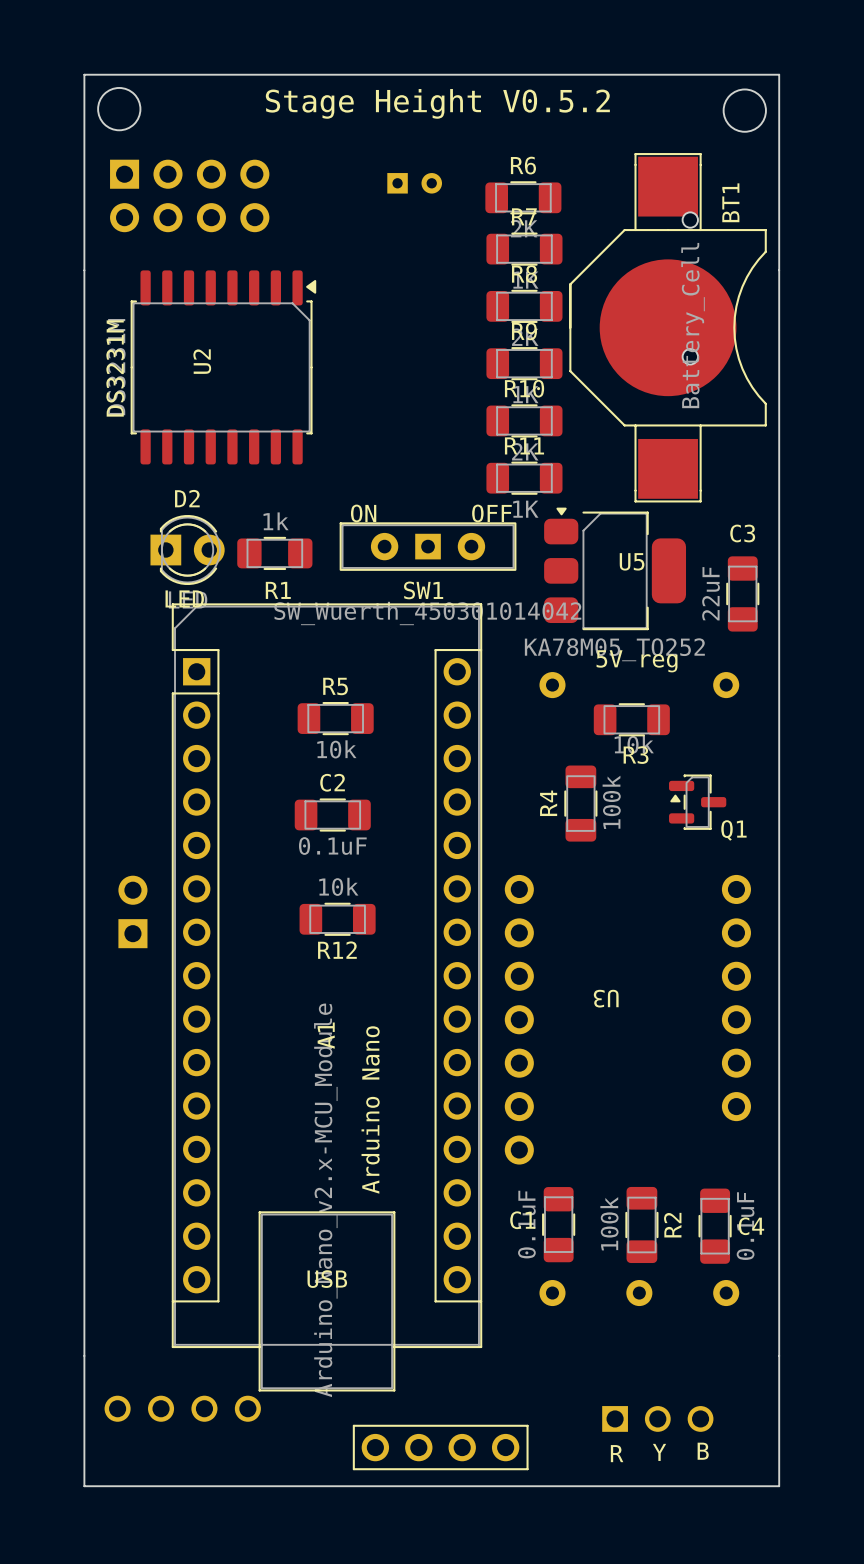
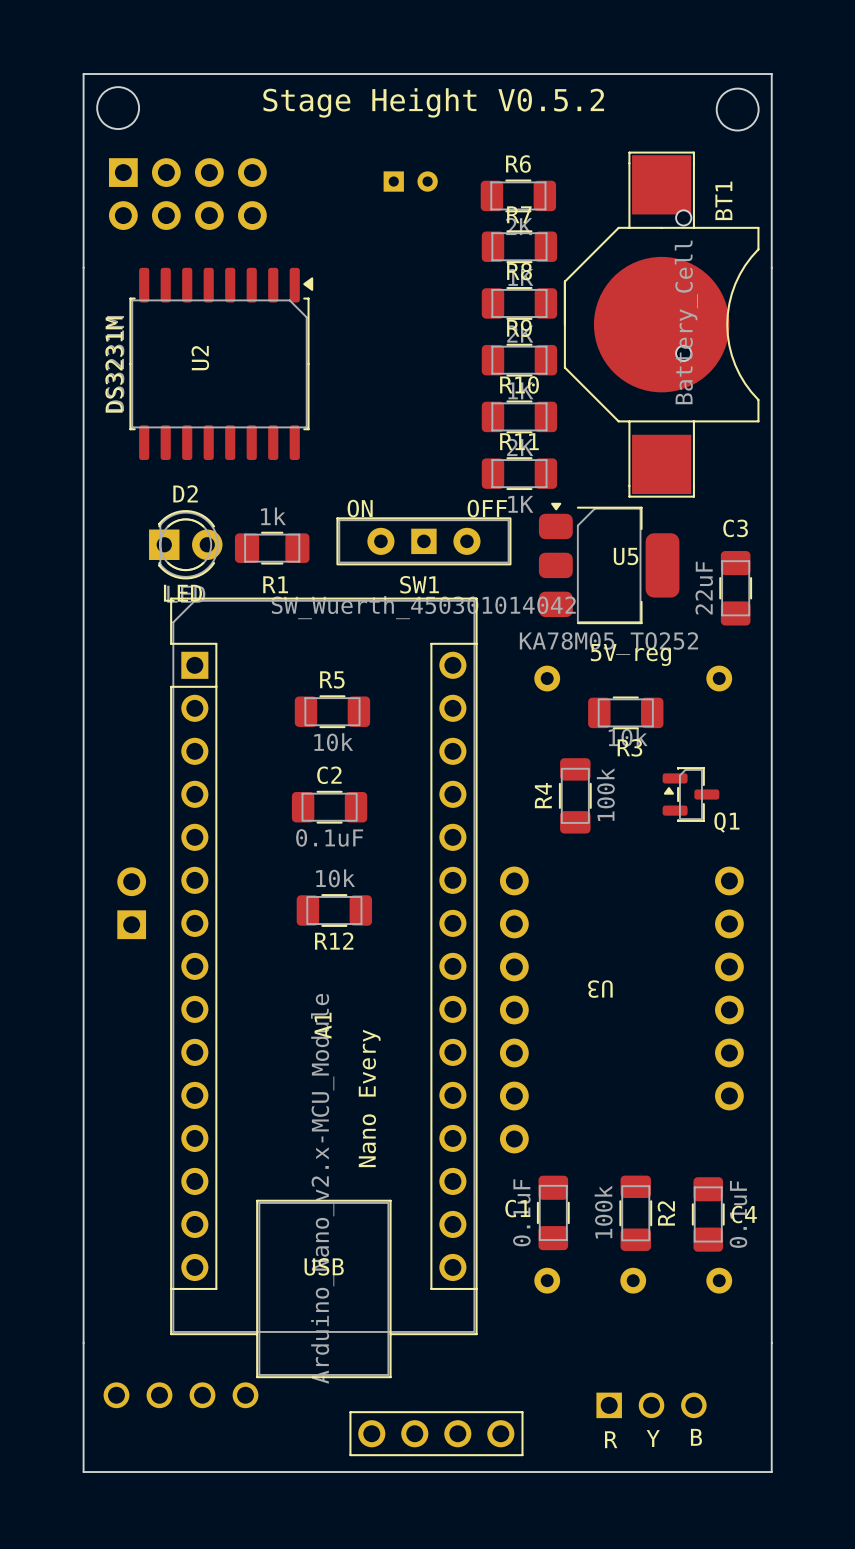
text: Arduino Nano (370, 1109) -> Nano Every (369, 1098)

